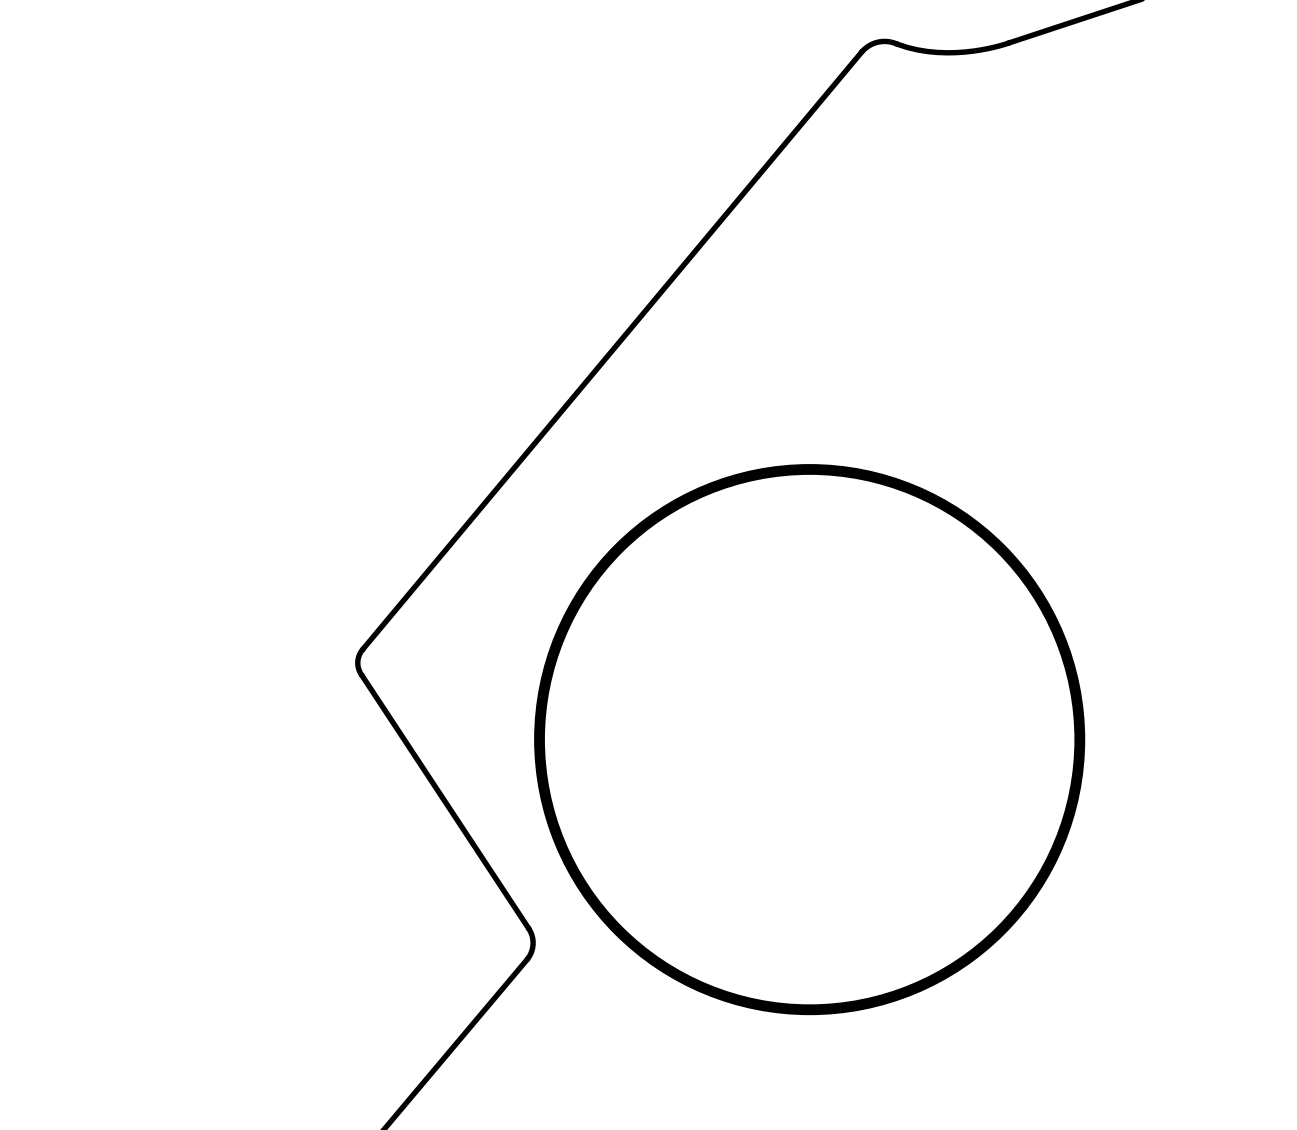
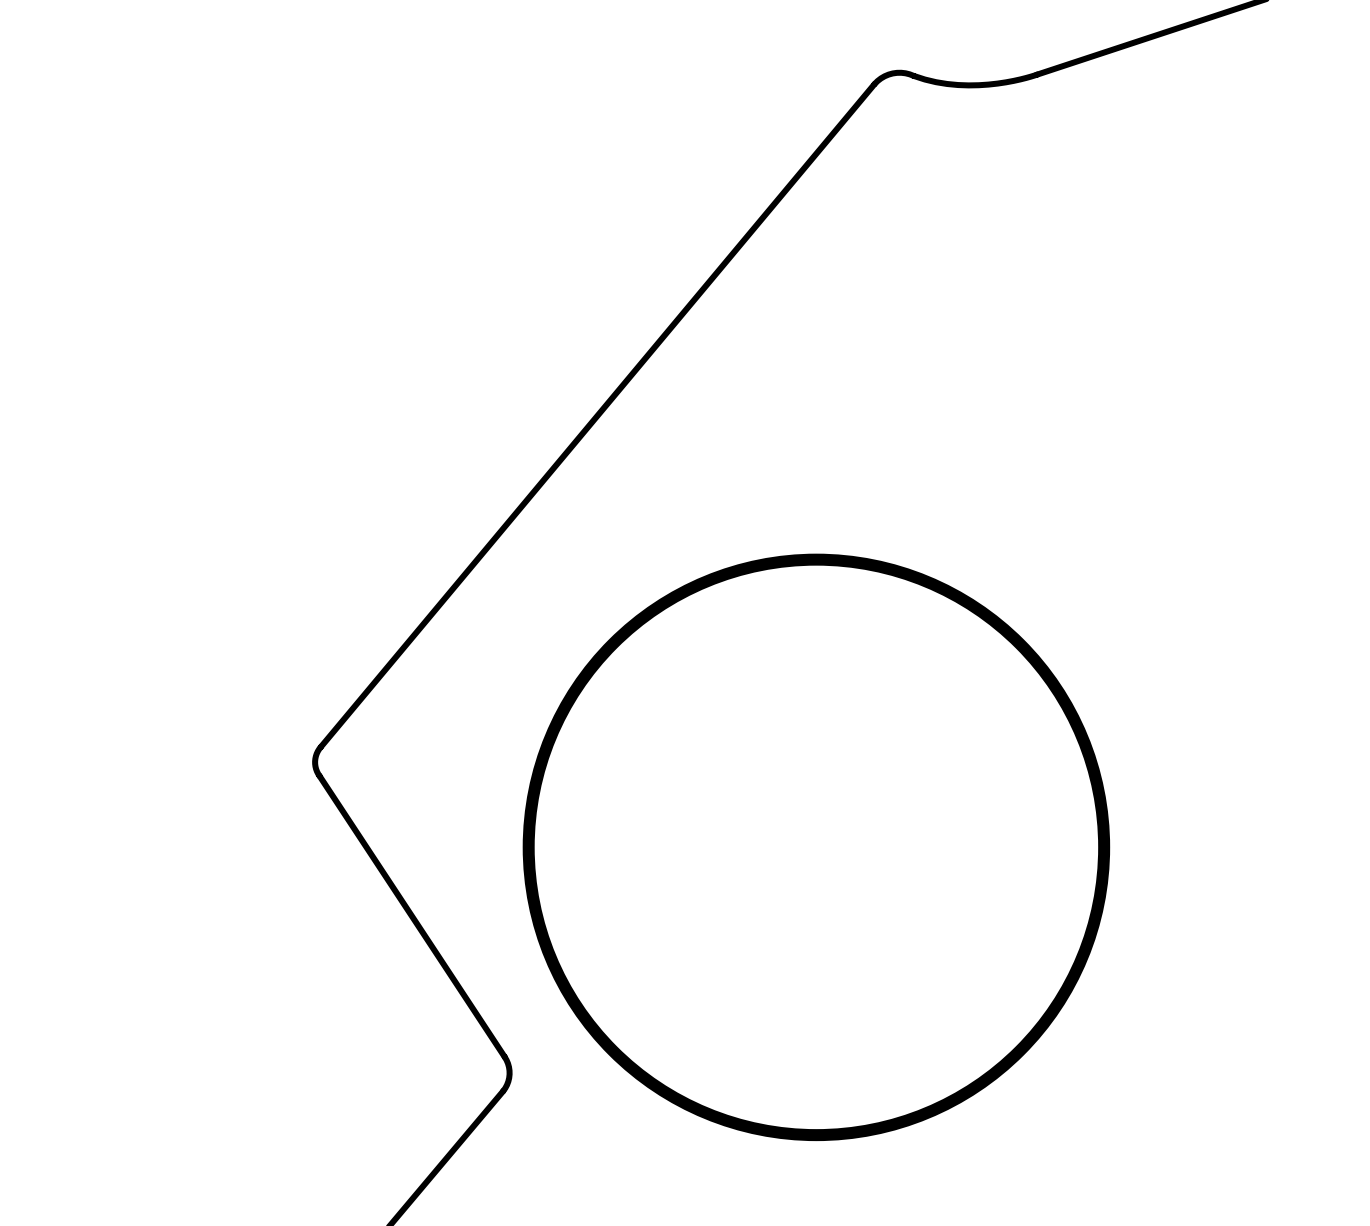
round board edge size: [534, 464, 1086, 1016] -> [522, 553, 1111, 1142]

